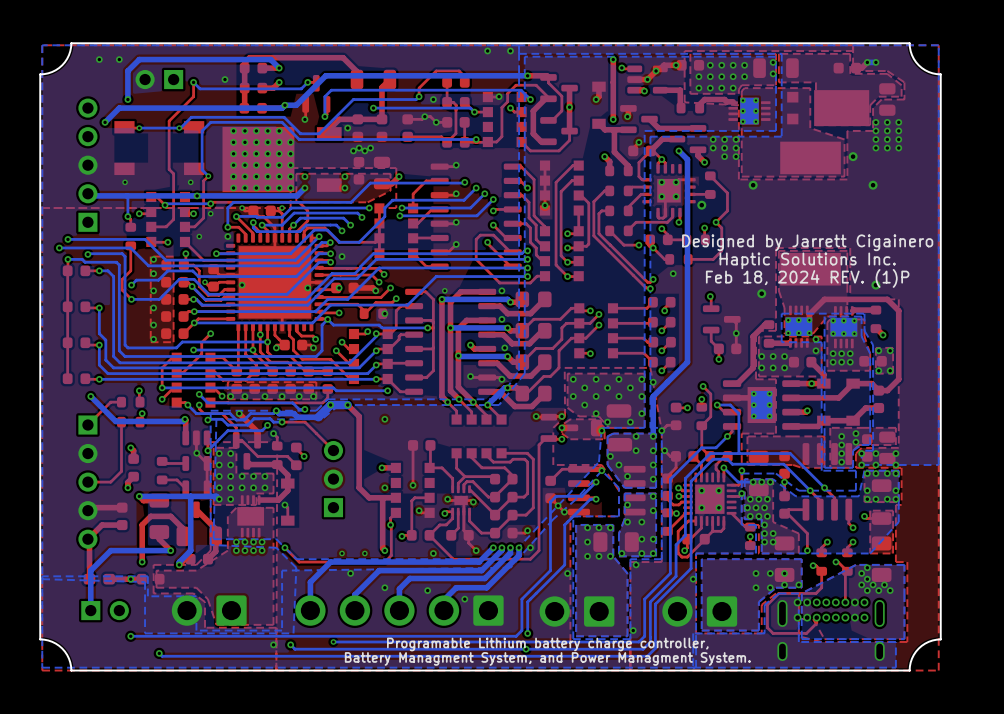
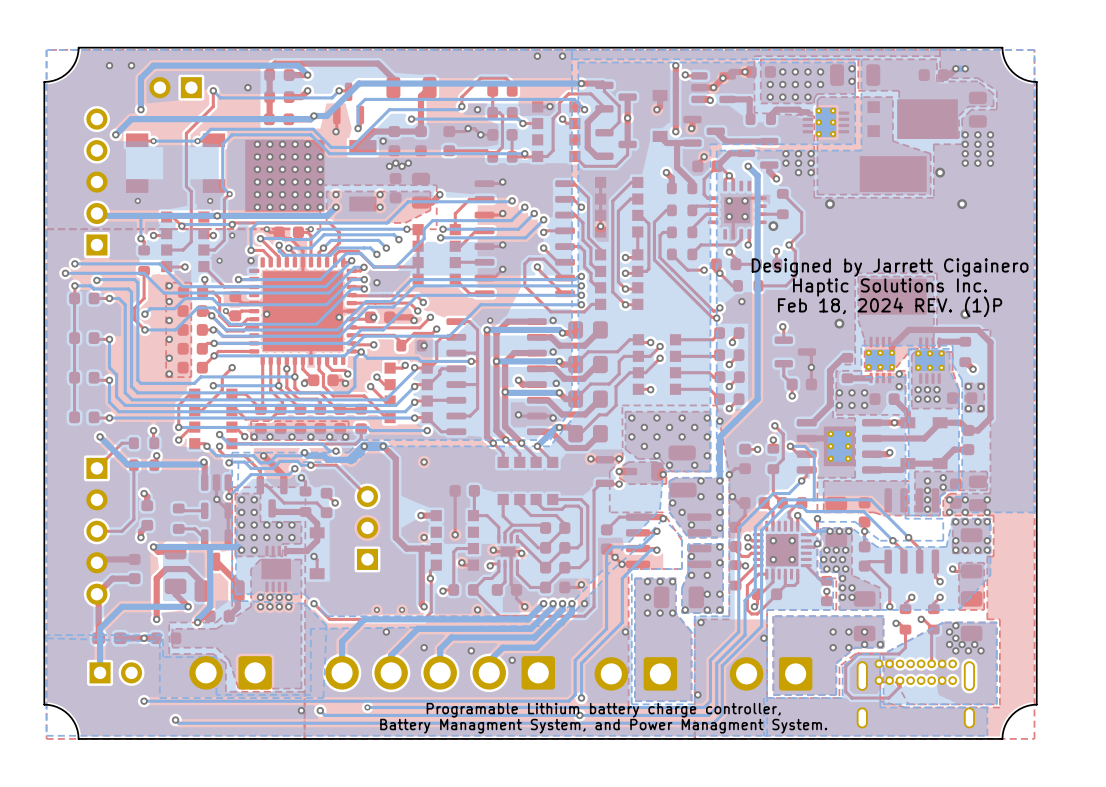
top track: (665, 212) (663, 218) (658, 217) (658, 212) -> none

